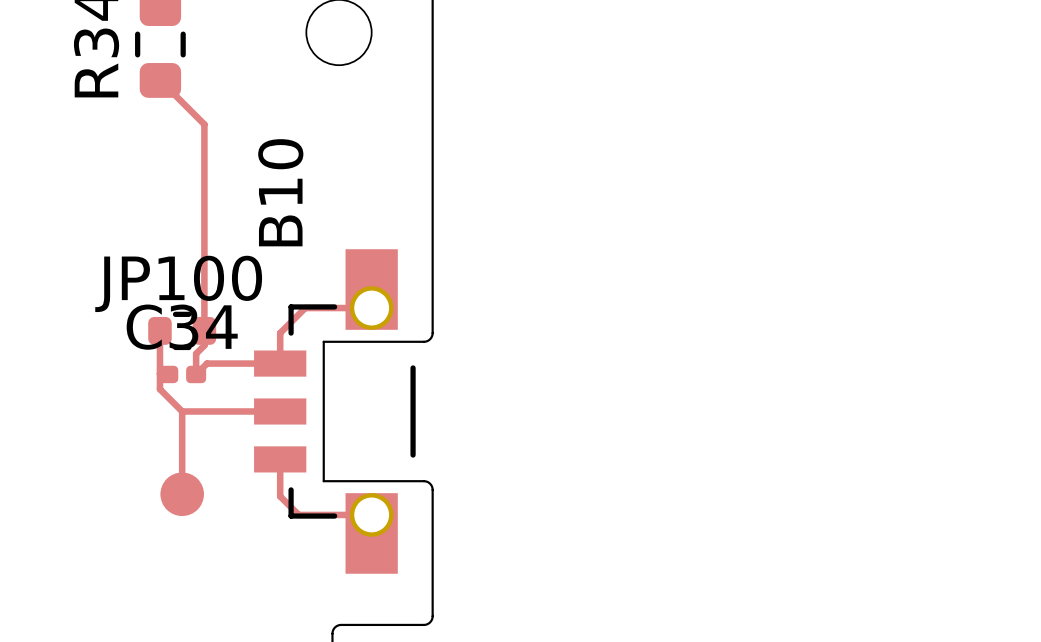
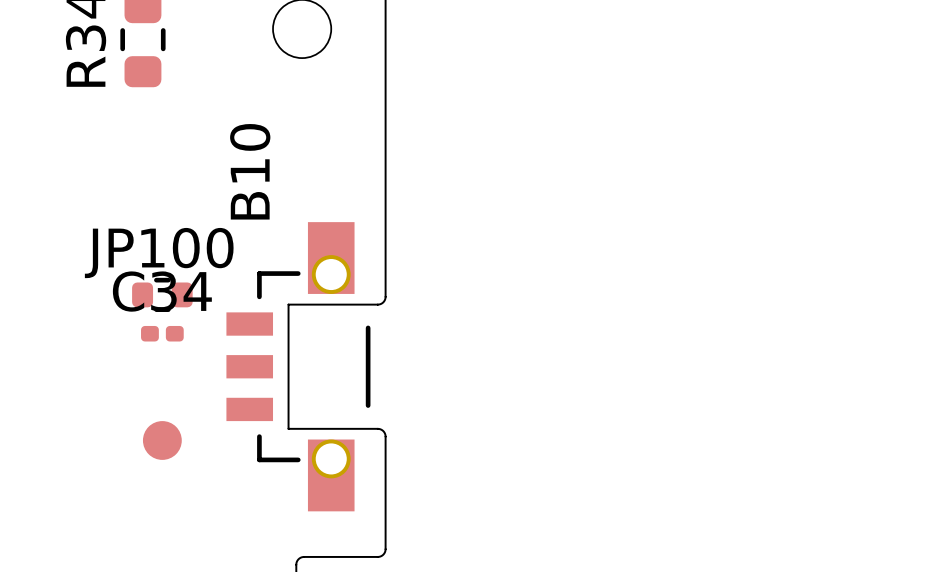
top track: (160, 80) (204, 124) (204, 345) (196, 353) (196, 374) (207, 363) (280, 363) (280, 333) (305, 308) (371, 308) -> none
top track: (159, 330) (159, 389) (182, 411) -> none
top track: (182, 411) (280, 411) -> none
top track: (182, 411) (182, 494) -> none
top track: (280, 459) (280, 496) (298, 514) (371, 514) -> none

